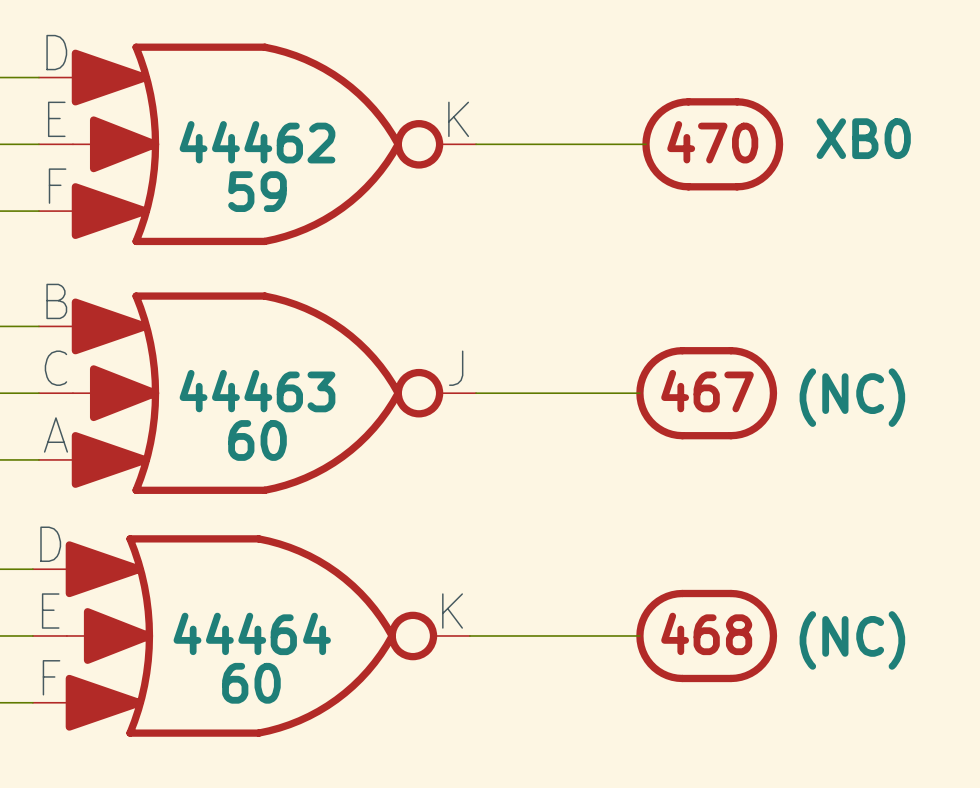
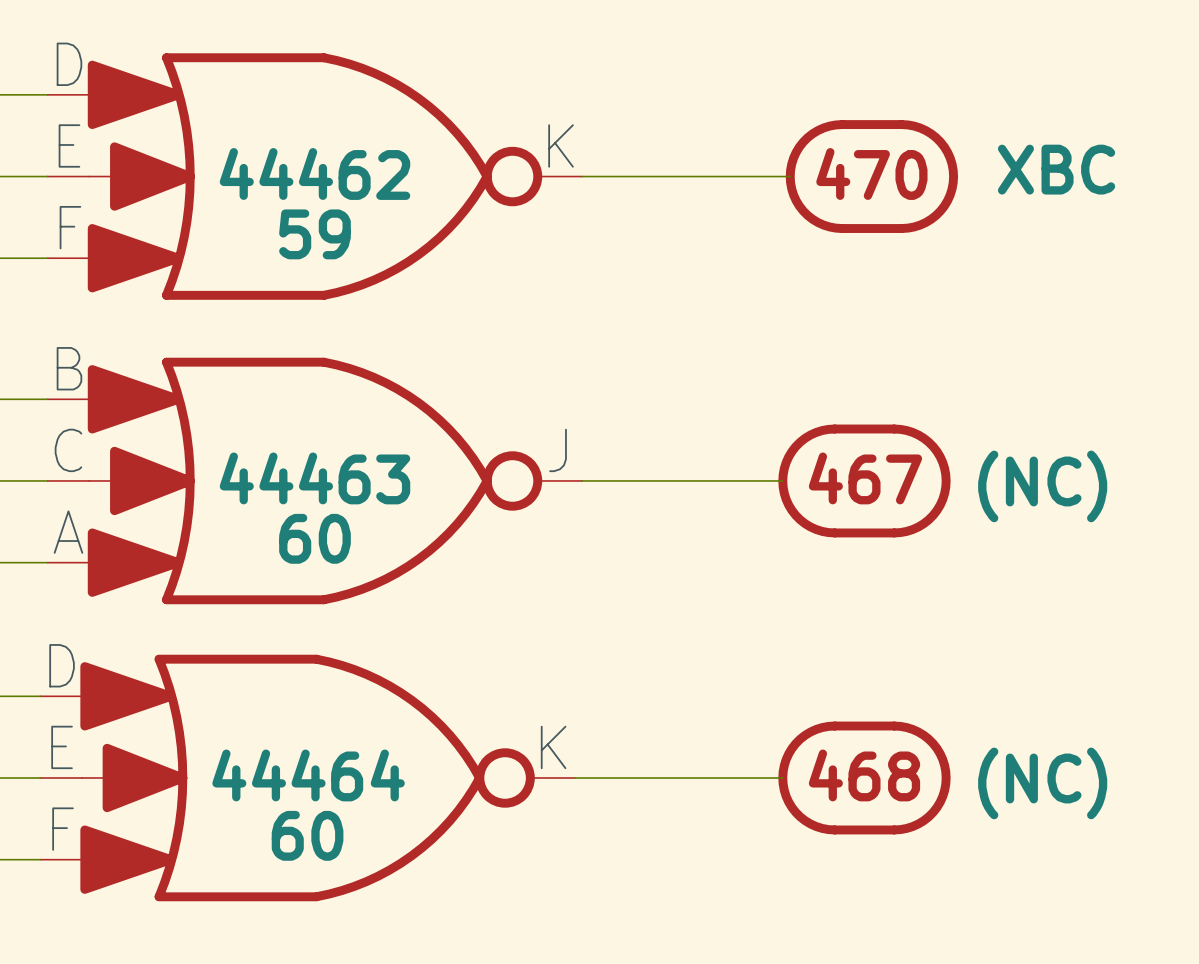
part text: XB0 (863, 138) -> XBC (1056, 169)

